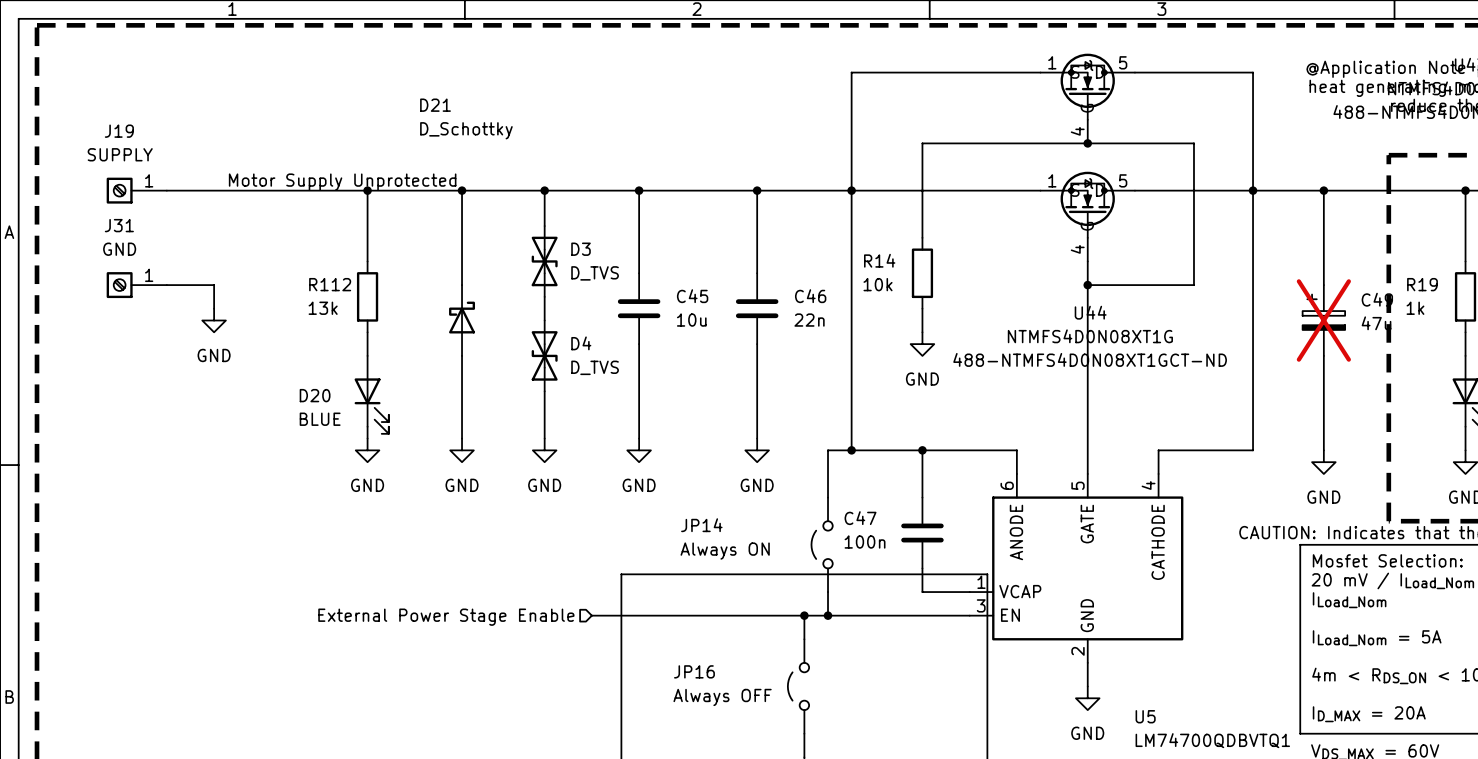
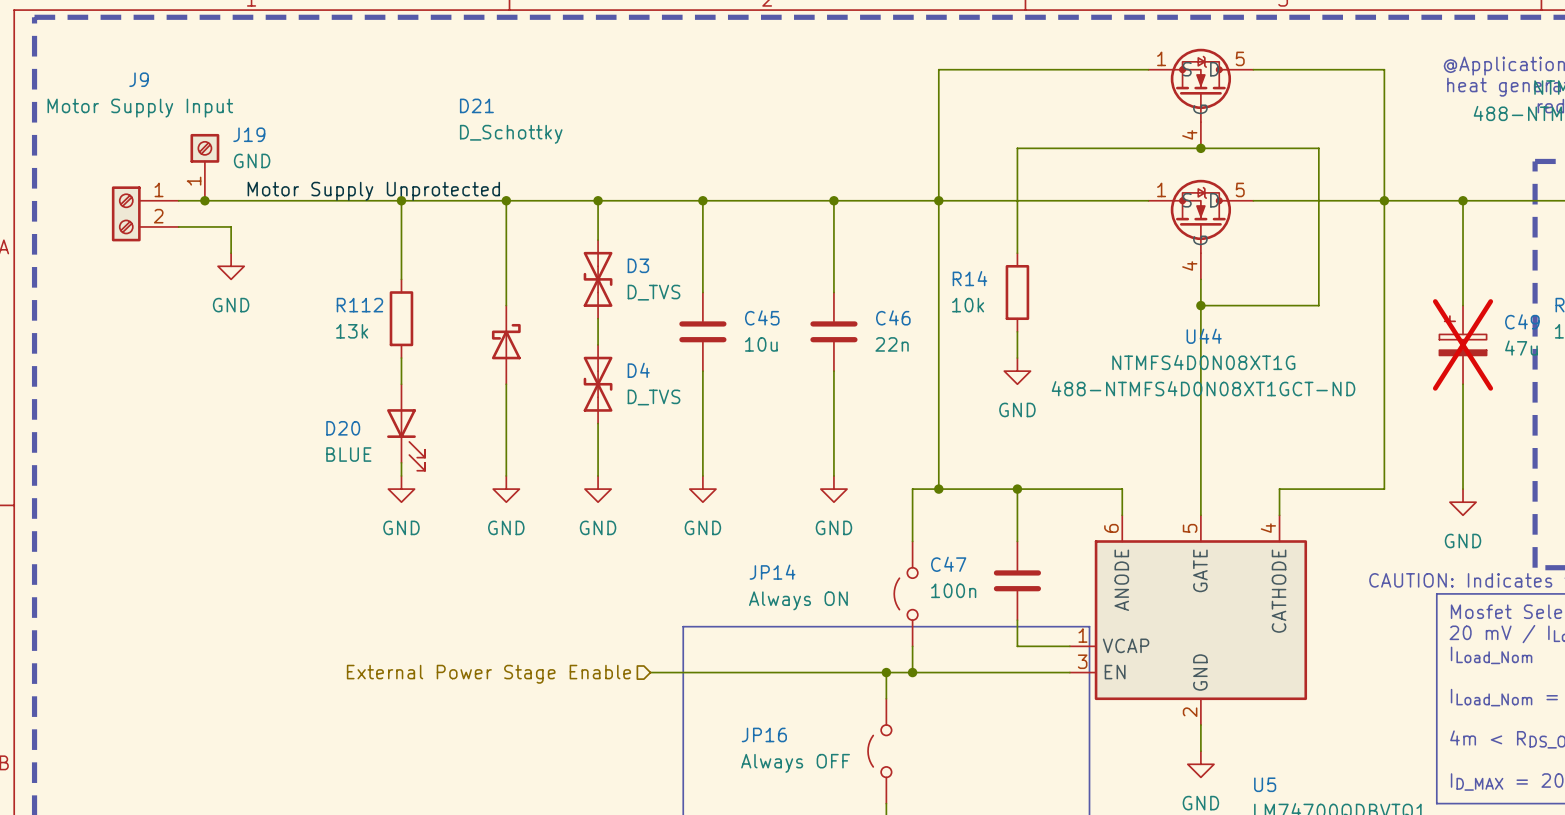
J19 name position: J19 (119, 131) -> J19 (249, 134)
J19 value: SUPPLY (120, 154) -> GND (252, 160)
J19 rotation: 0° (119, 190) -> 90° clockwise (204, 148)
J19 position: (136, 190) -> (204, 167)
junction: none -> (204, 200)
J9: none -> Motor Supply Input (145, 213)
J31: GND (136, 285) -> none
wire: (166, 285) (214, 285) (214, 308) -> (178, 226) (231, 226) (231, 253)
power symbol position: GND (214, 320) -> GND (231, 266)

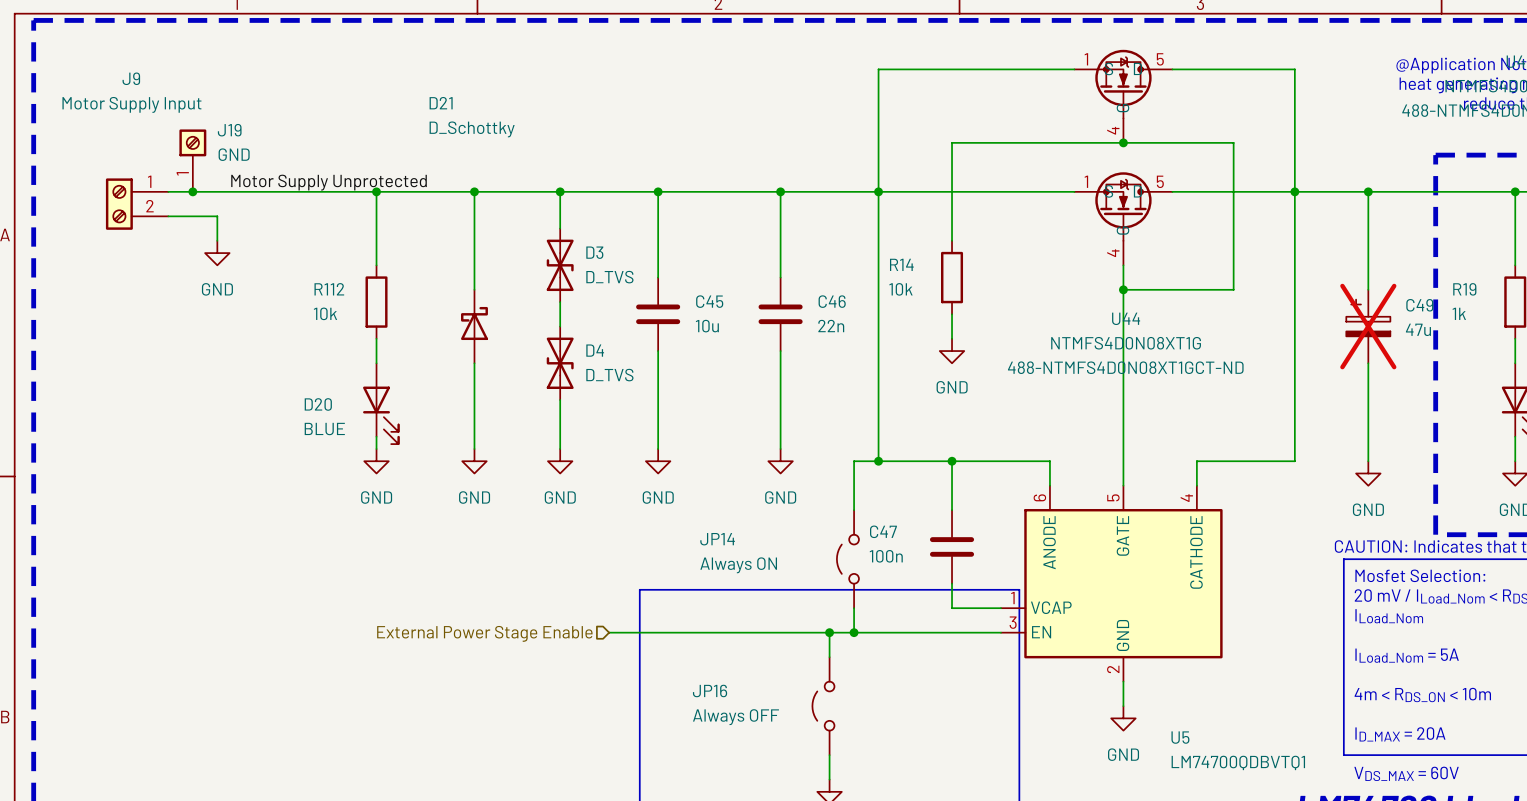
R112 value: 13k (352, 331) -> 10k (325, 313)

